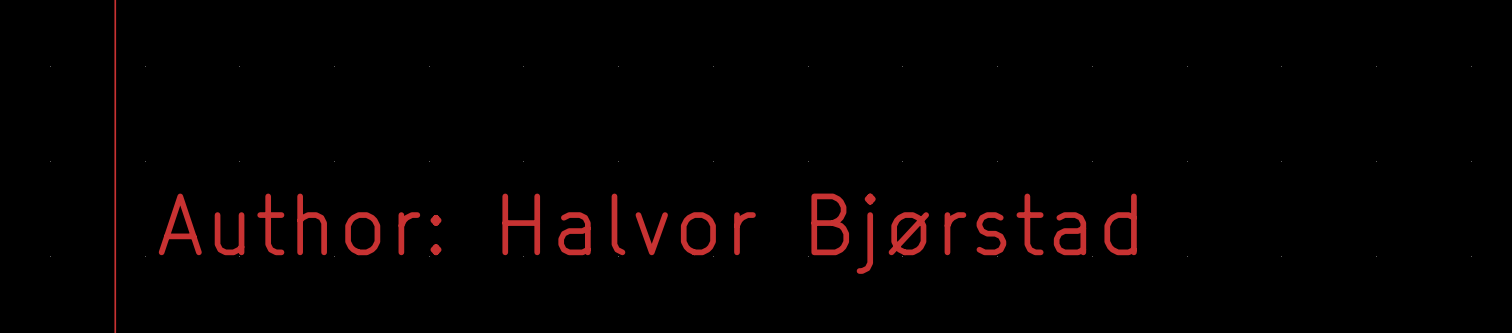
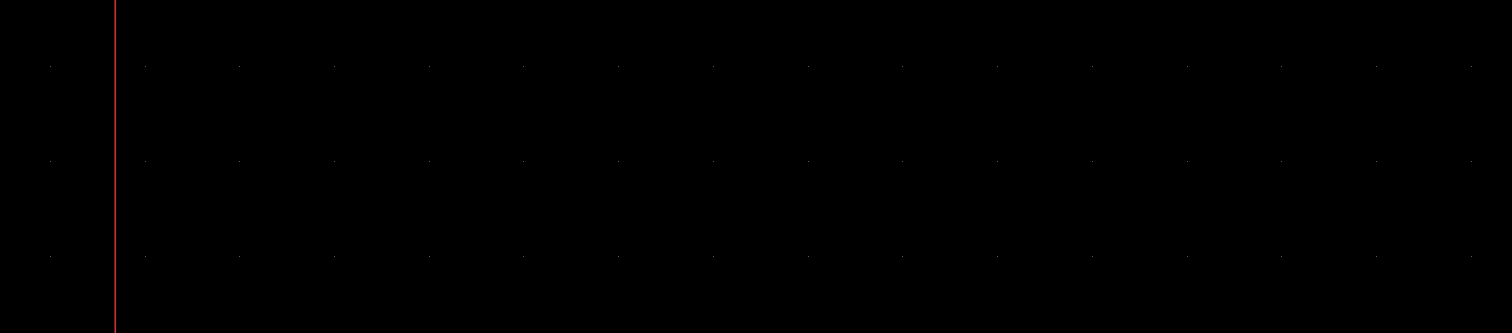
title block: Author: Halvor Bjørstad (647, 233) -> none

